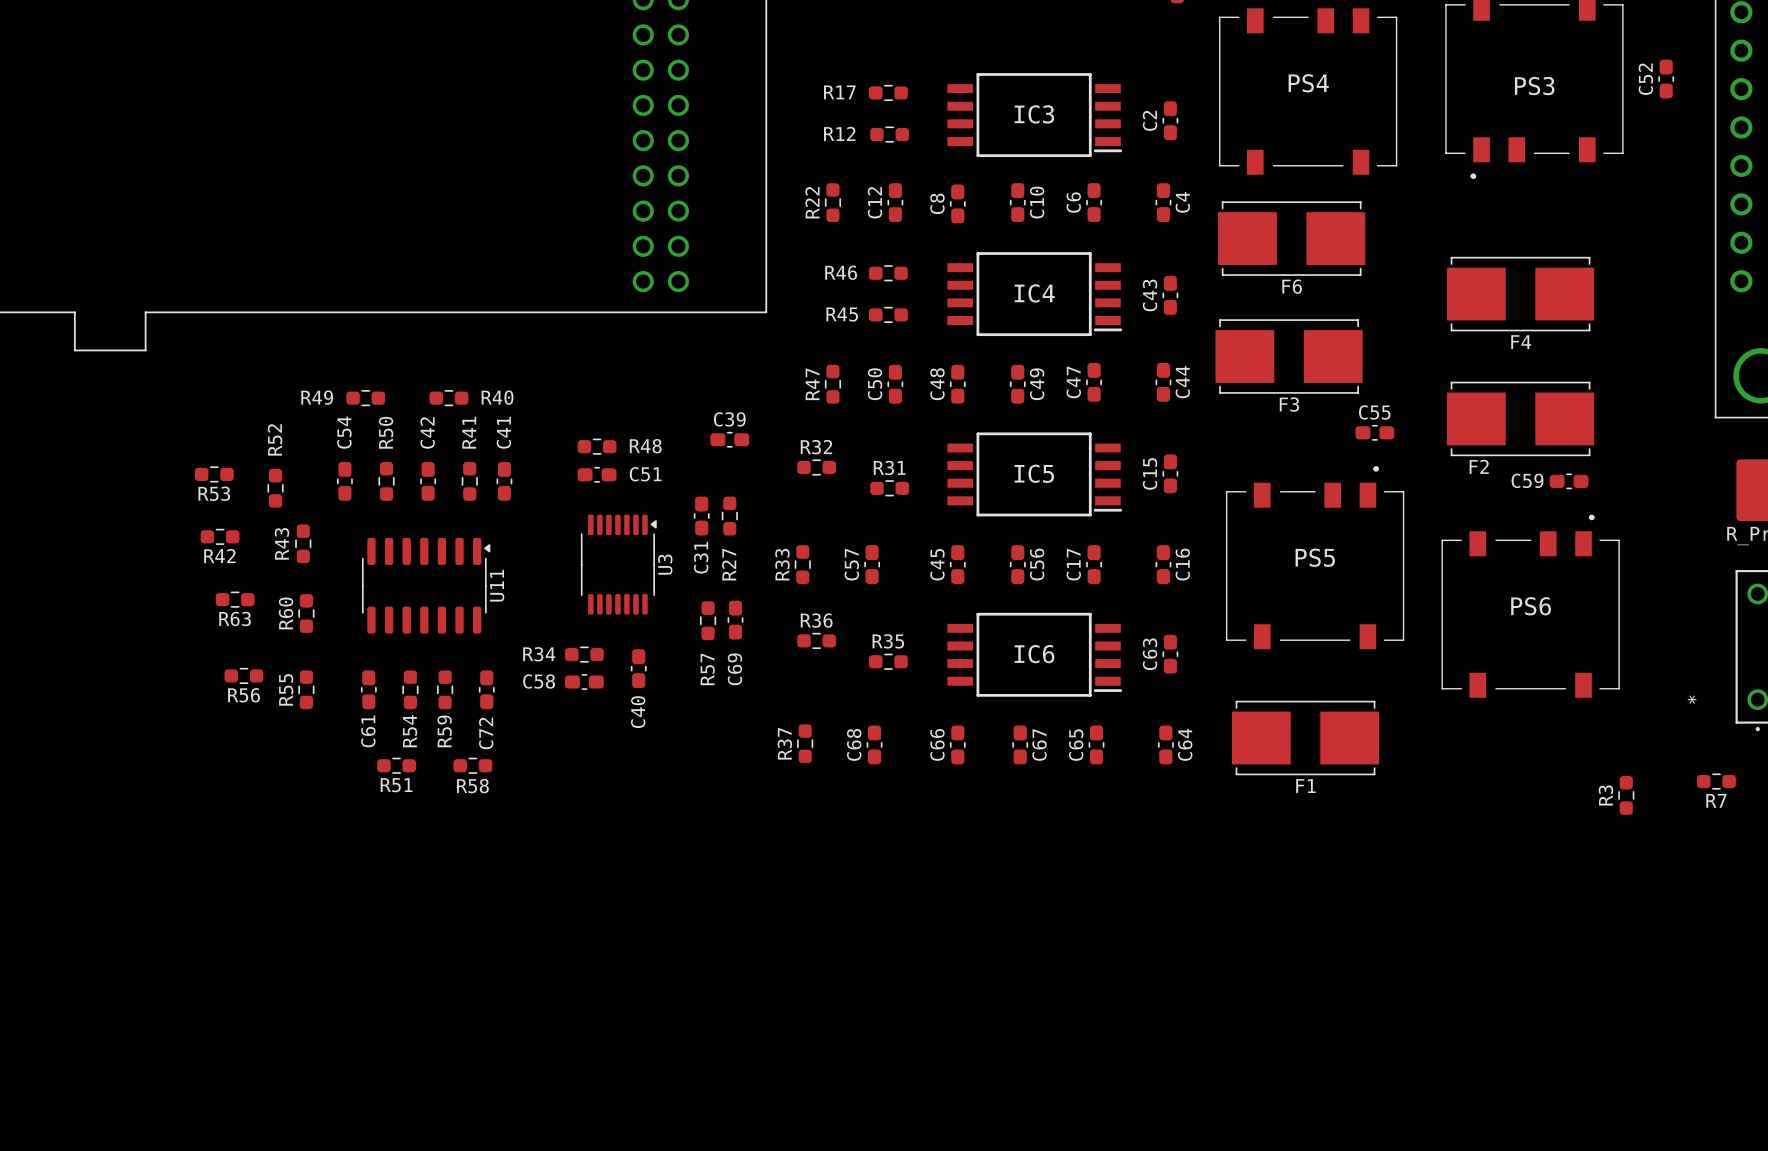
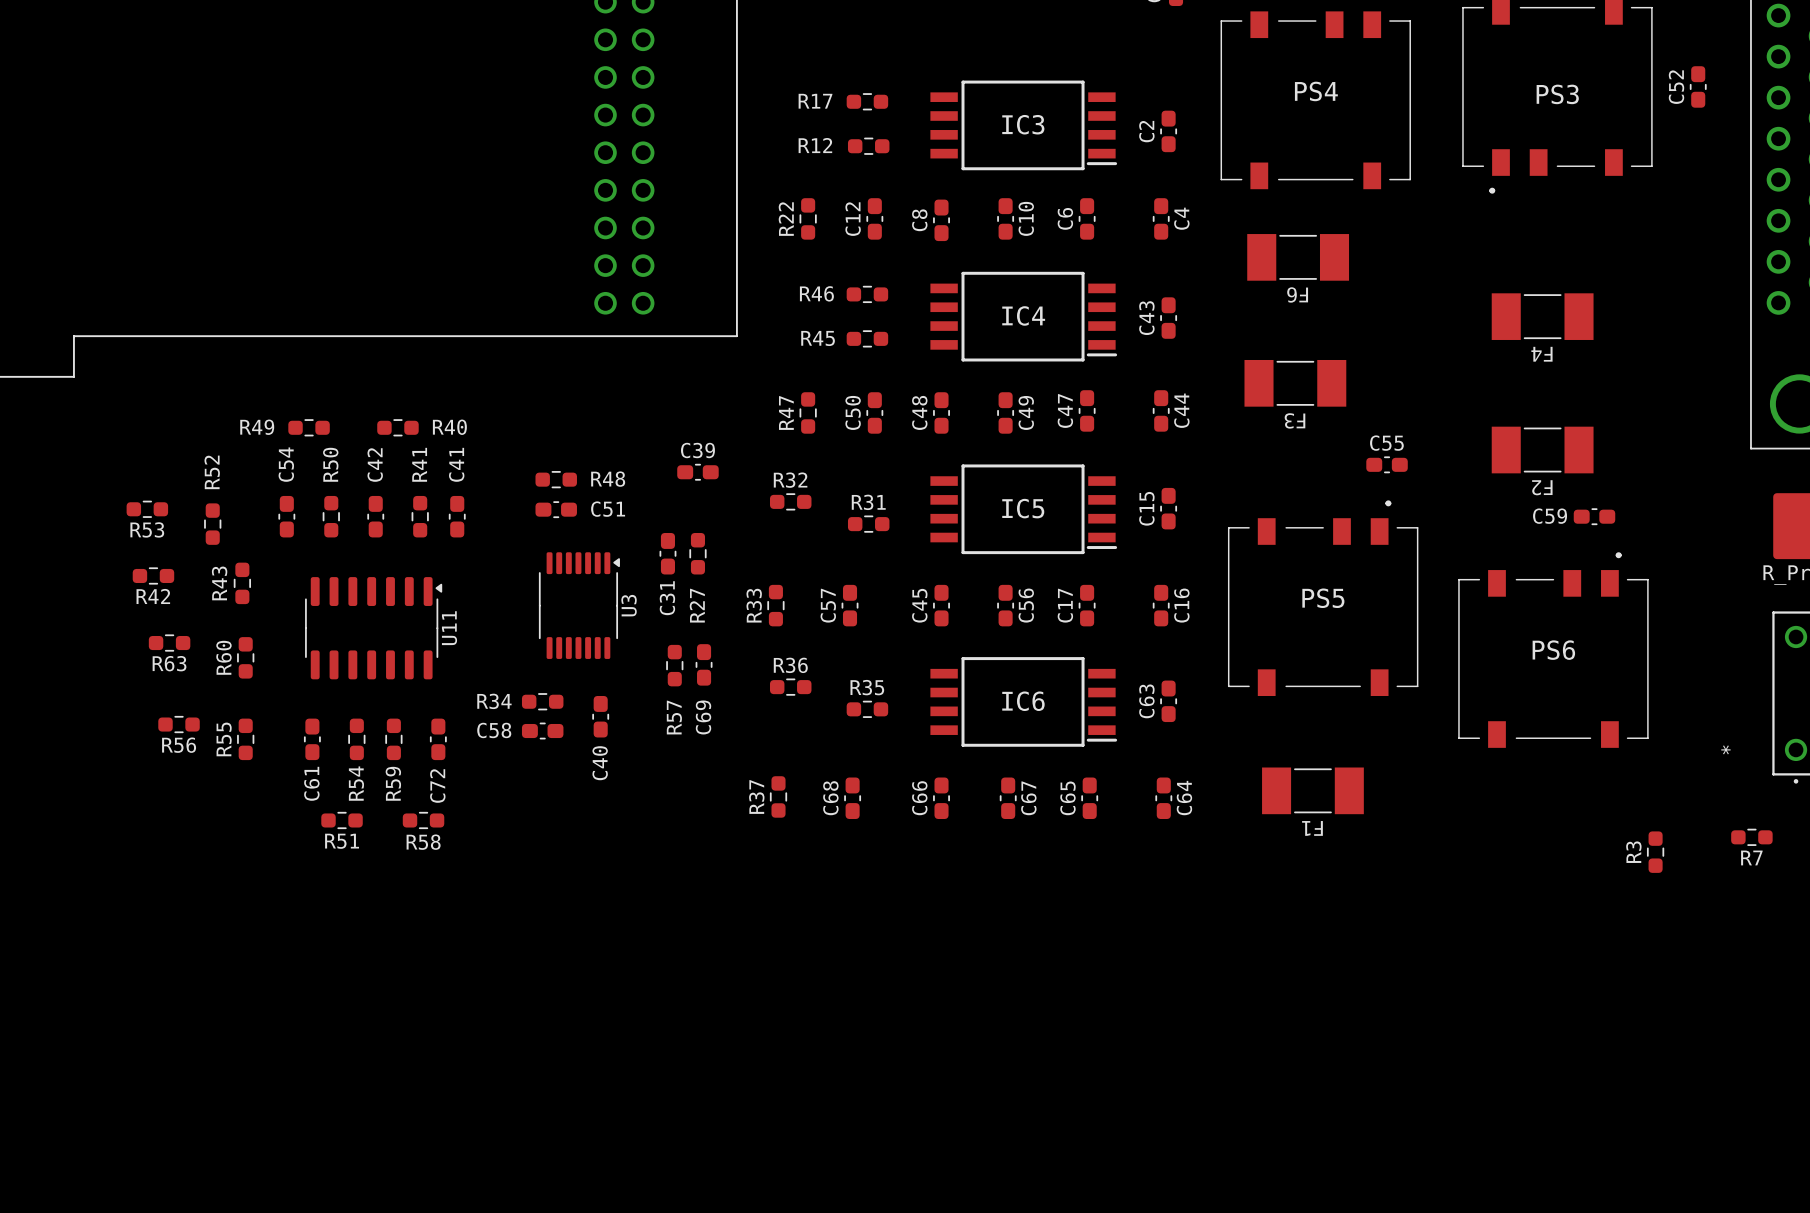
F6 footprint: [1218, 201, 1366, 276] -> [1247, 234, 1350, 281]
F4 footprint: [1446, 256, 1595, 332] -> [1491, 293, 1594, 340]
F3 footprint: [1215, 319, 1363, 394] -> [1244, 359, 1347, 407]
F2 footprint: [1446, 381, 1595, 457] -> [1491, 426, 1594, 474]
F2 name position: F2 (1479, 466) -> F2 (1542, 487)
F1 footprint: [1231, 700, 1380, 776] -> [1262, 767, 1364, 815]

